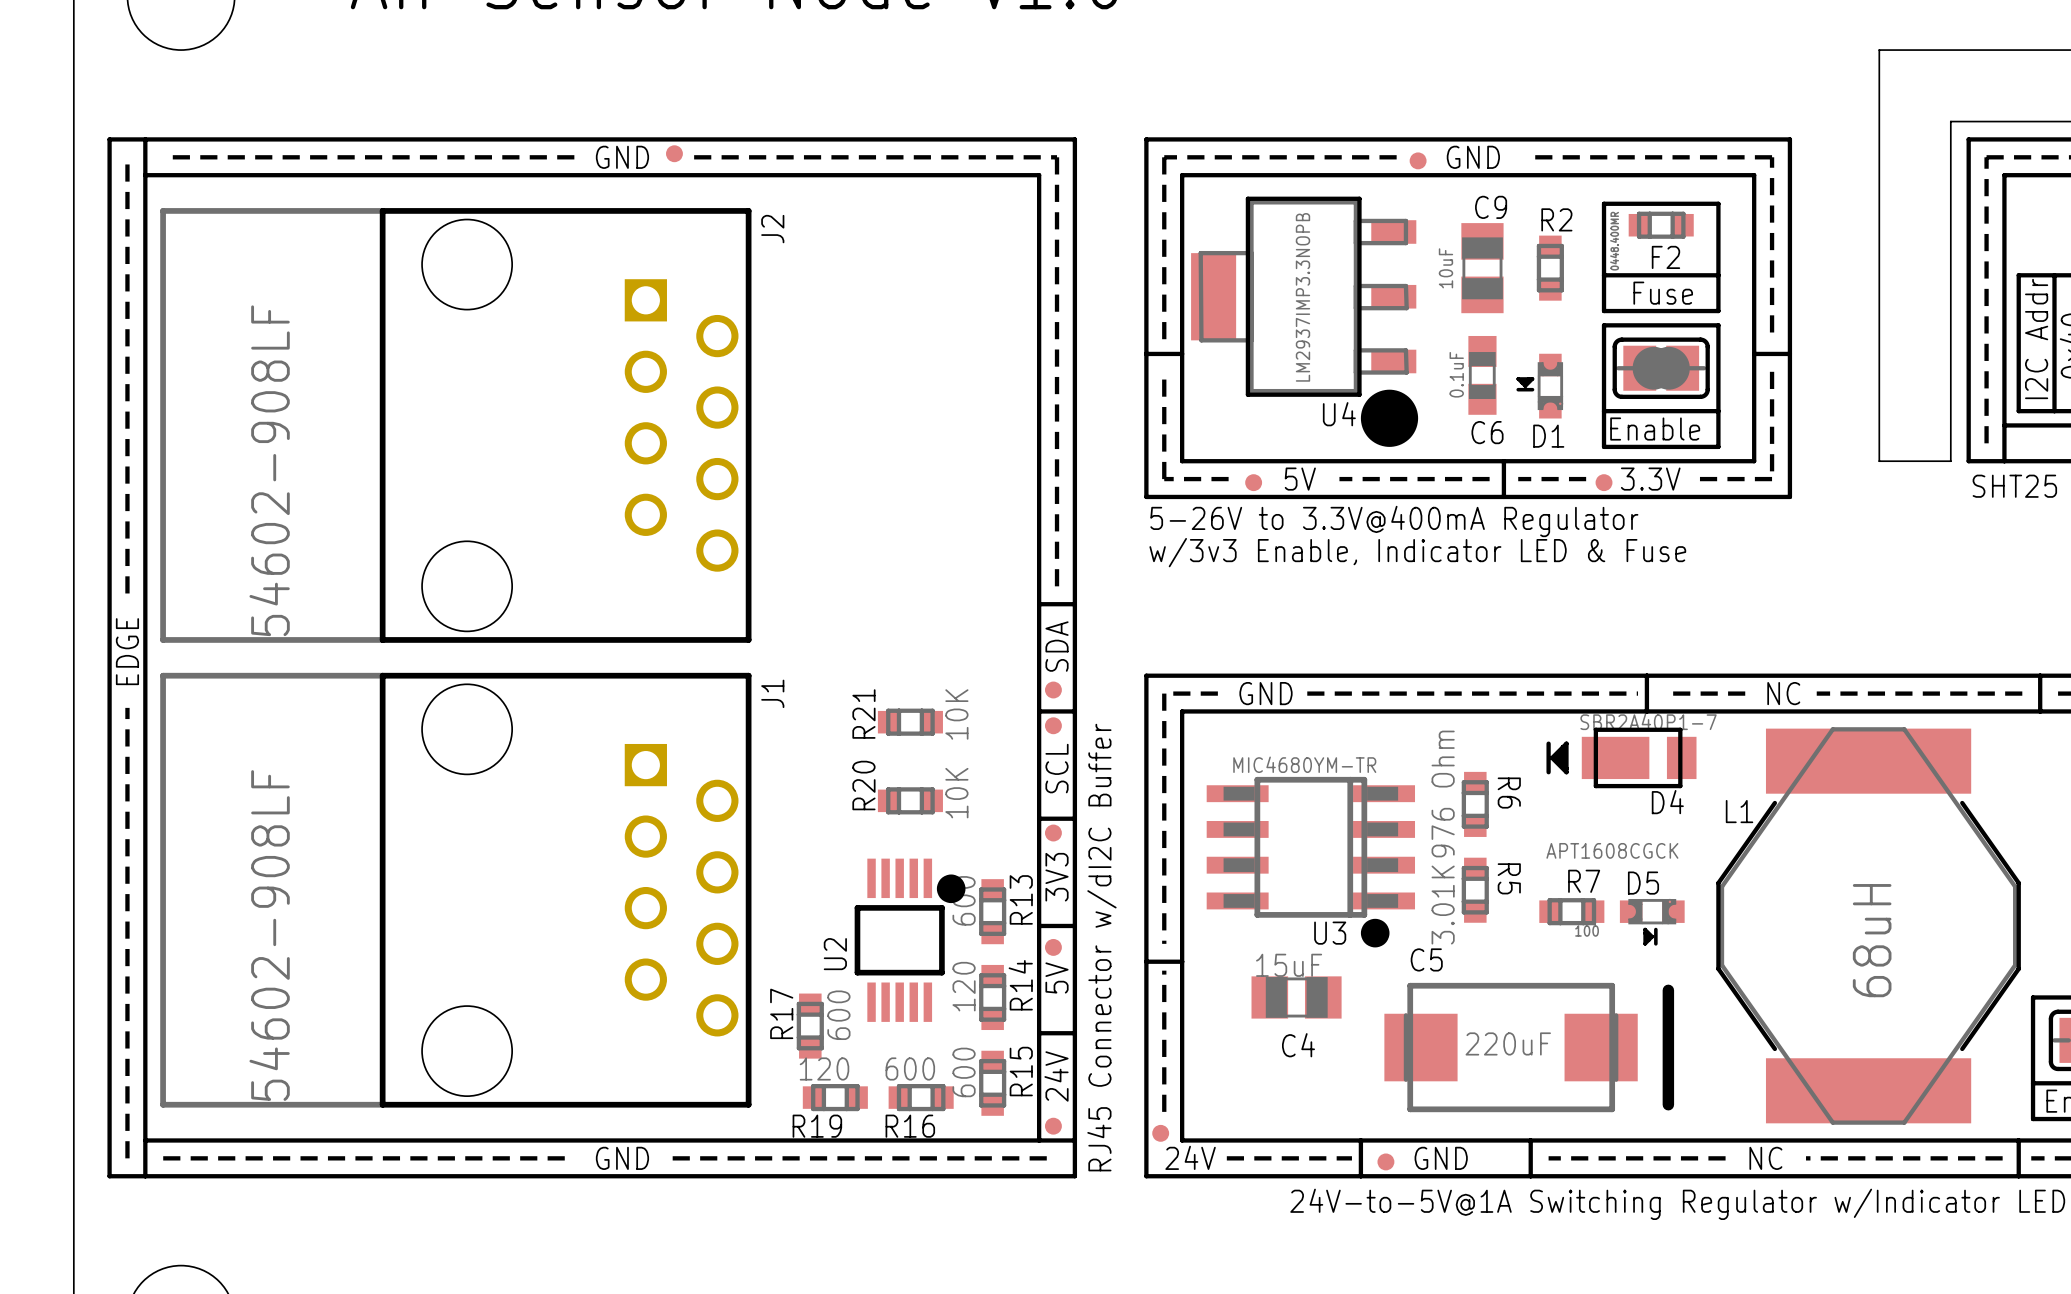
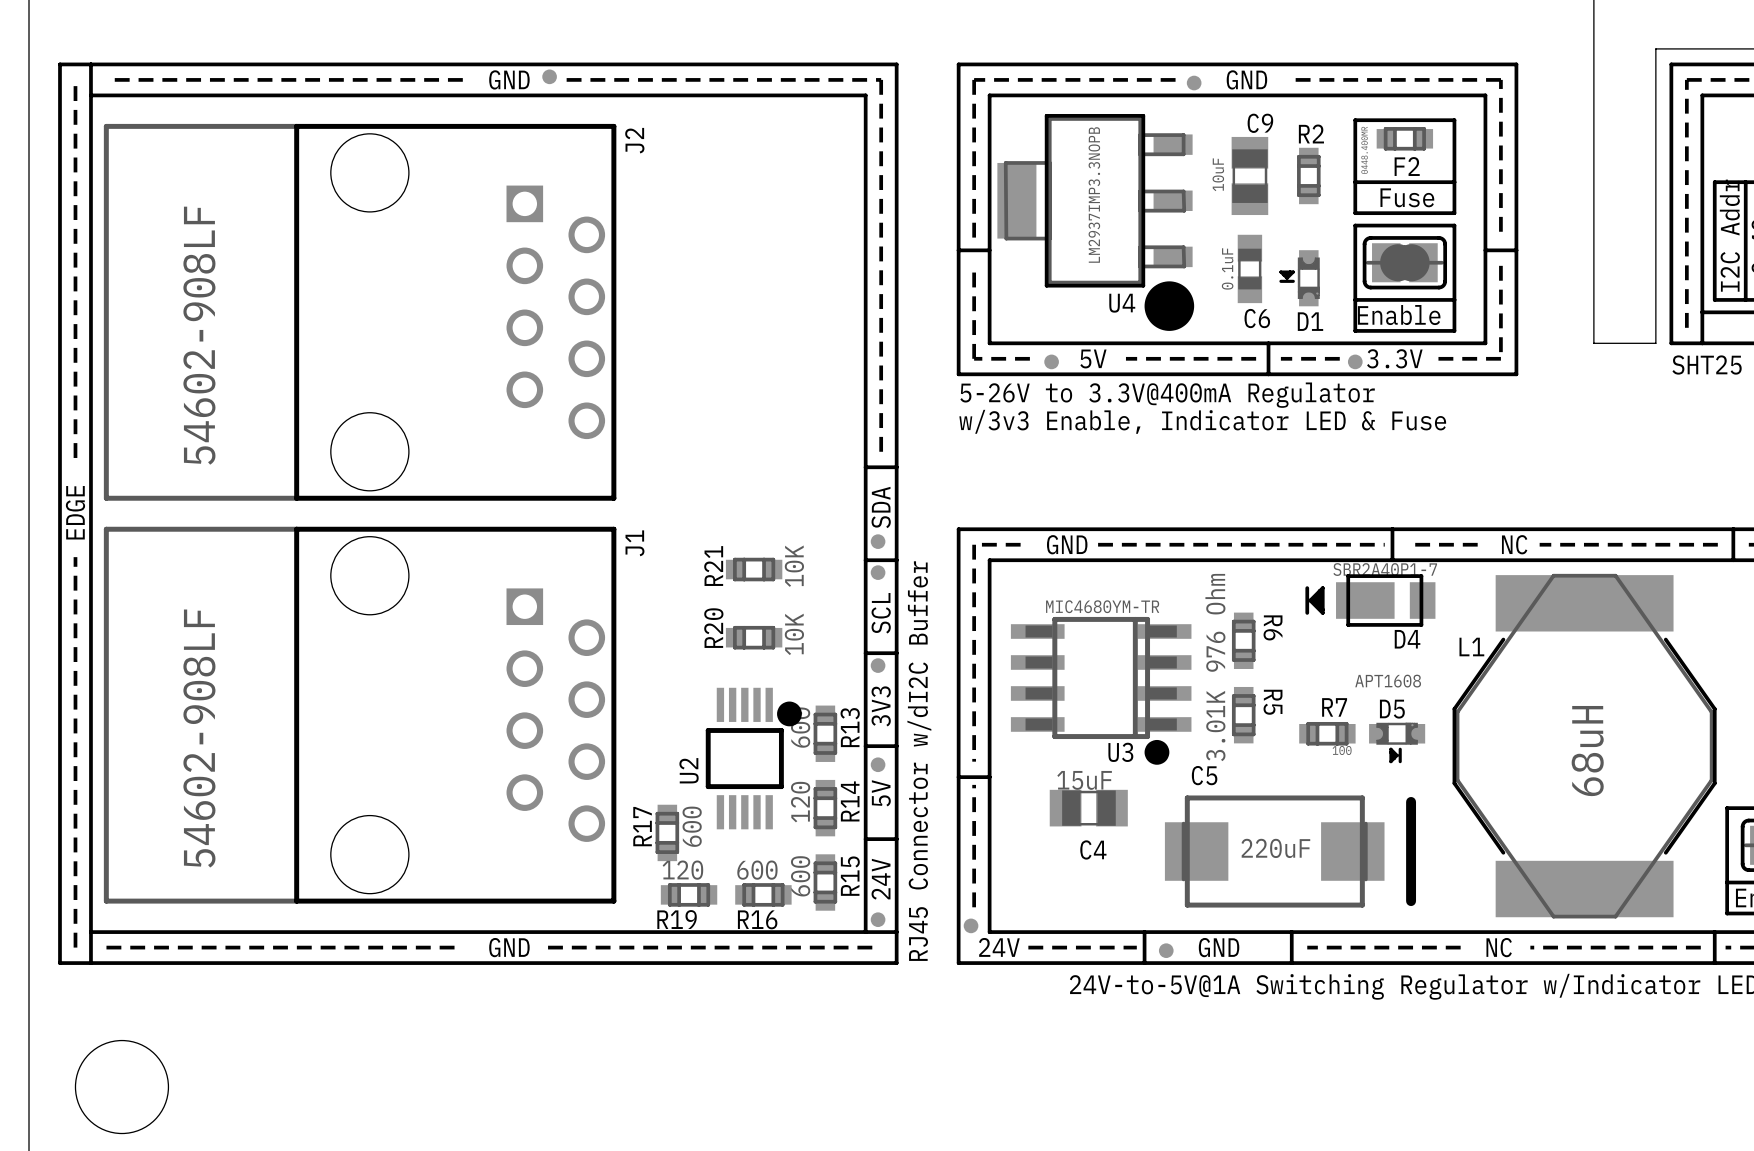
D5 value: APT1608CGCK (1612, 850) -> APT1608 (1388, 681)

